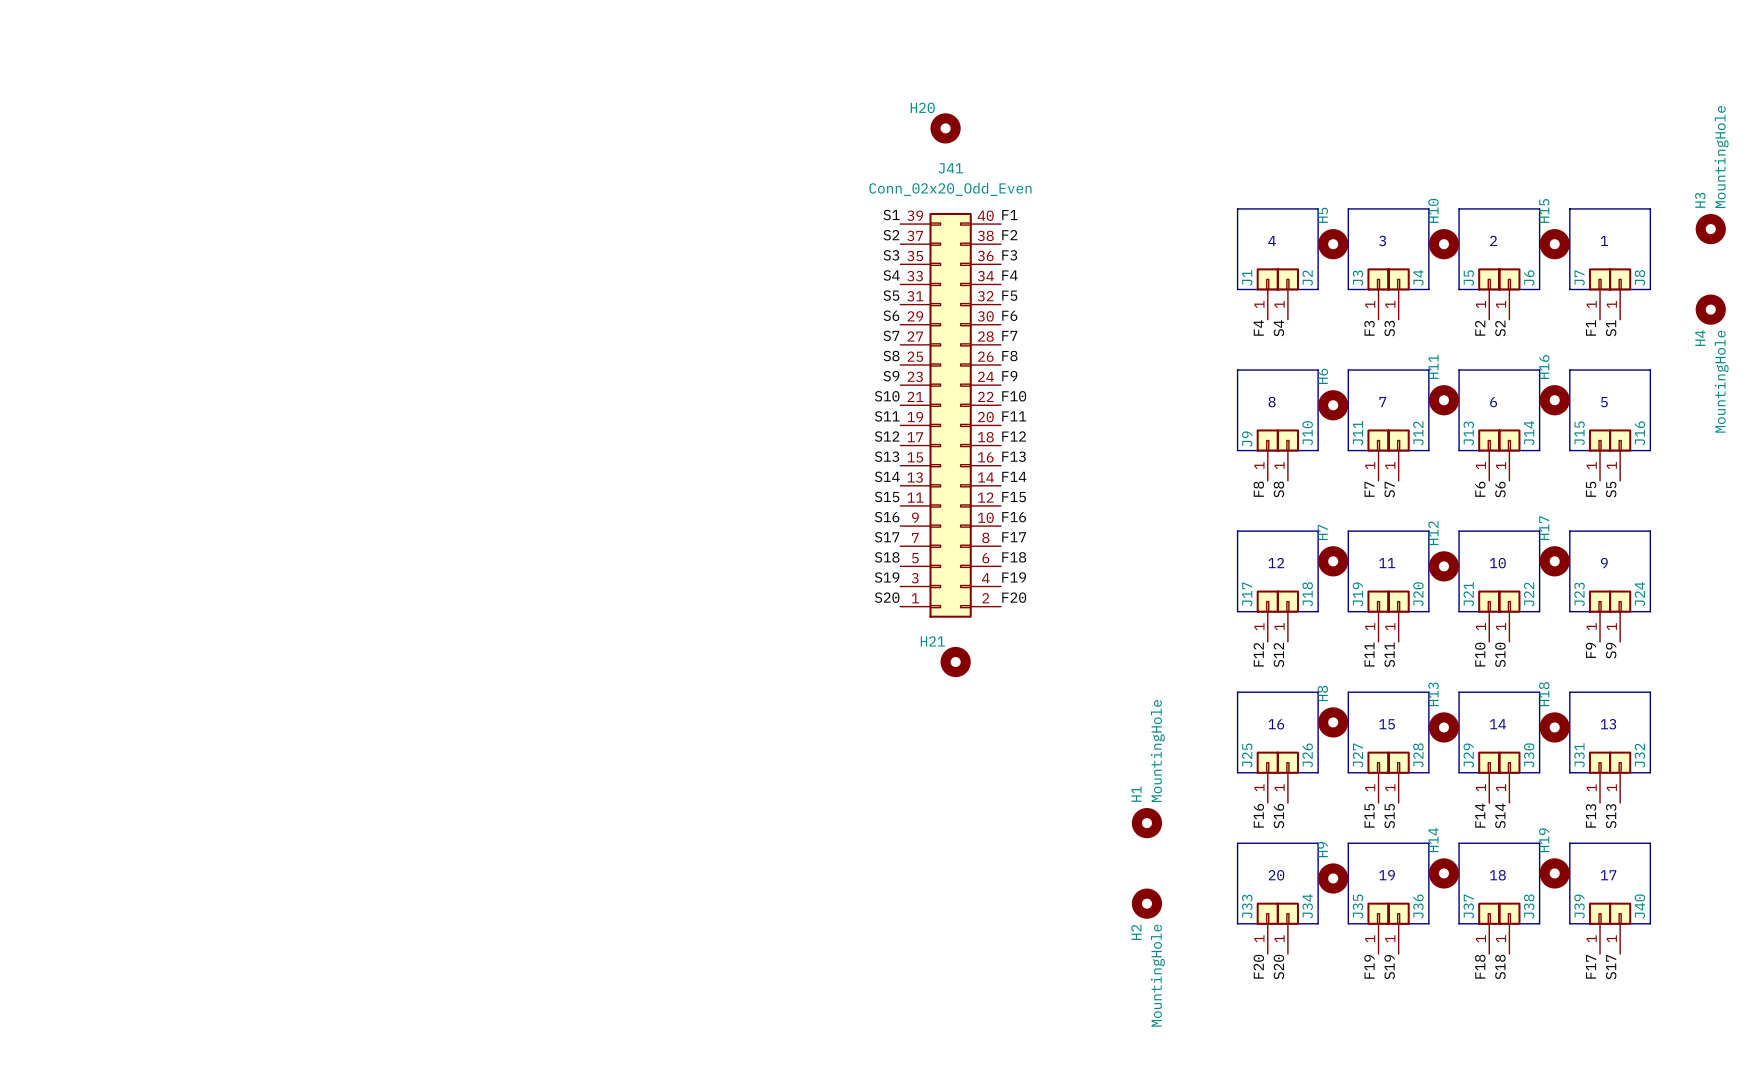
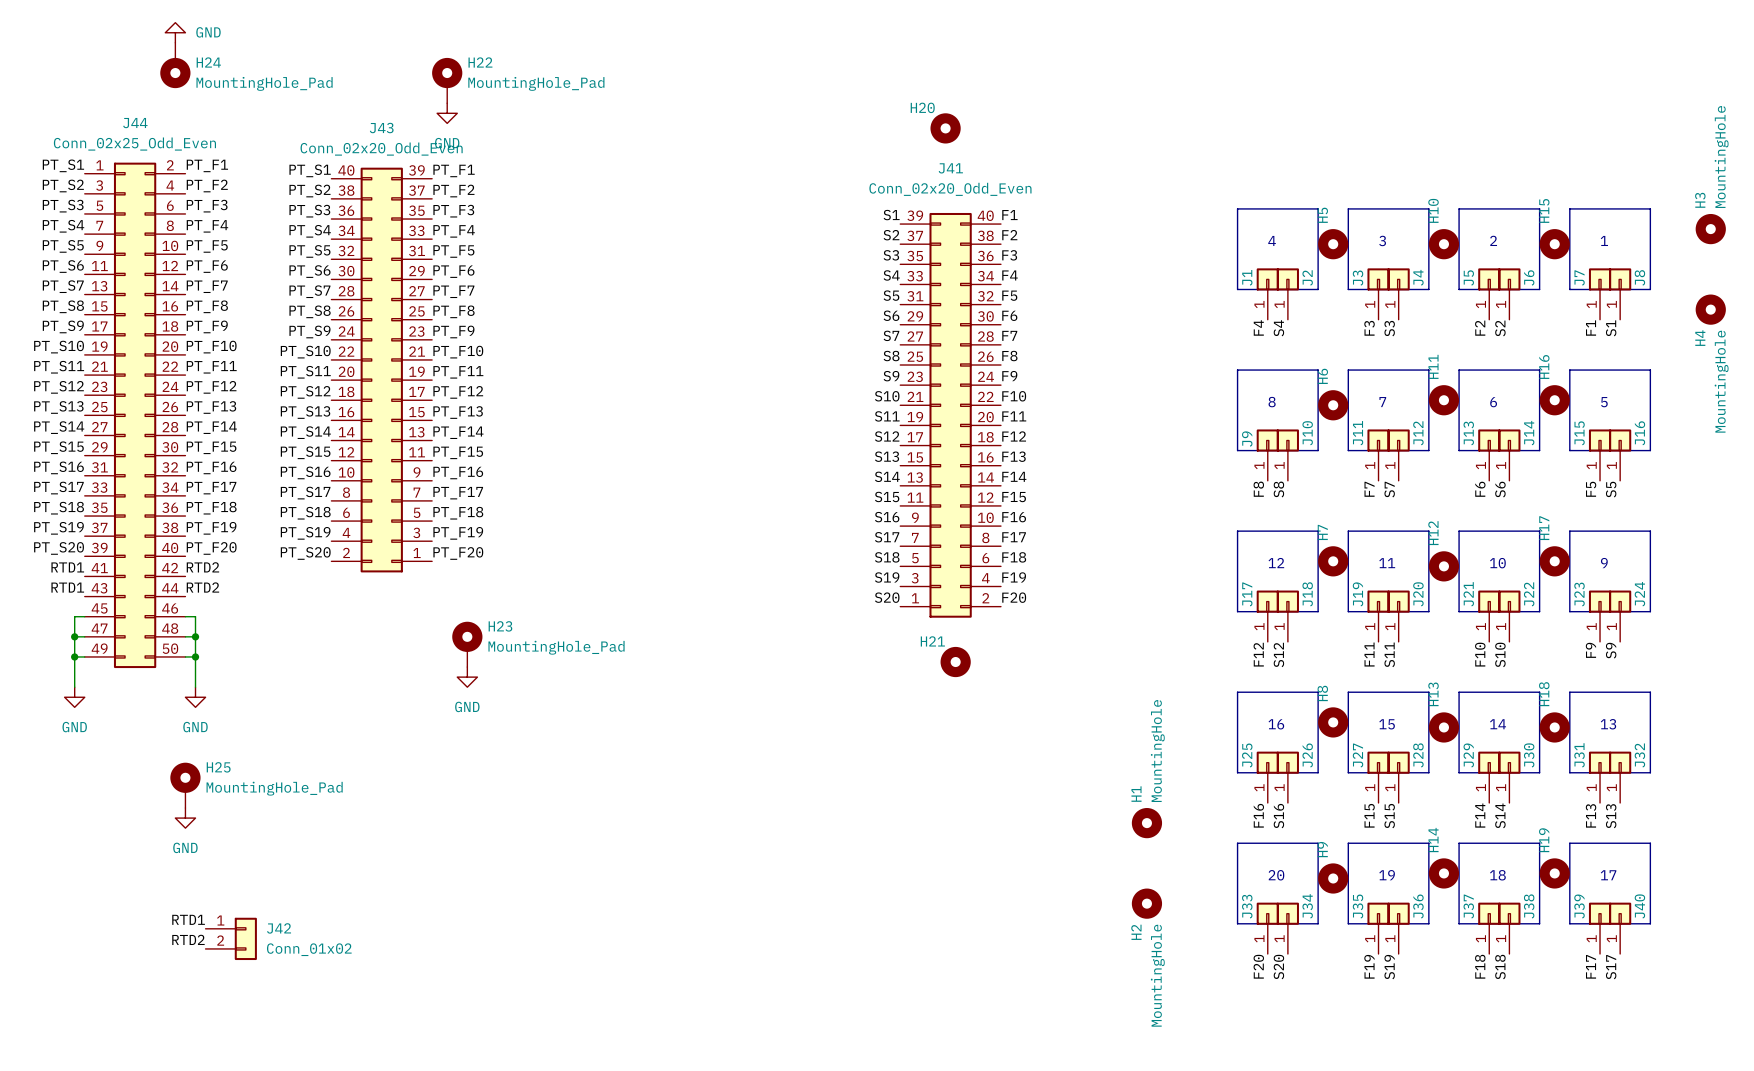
power symbol: none -> GND (175, 32)
H24: none -> MountingHole_Pad (175, 65)
H22: none -> MountingHole_Pad (447, 80)
power symbol: none -> GND (447, 113)
label: none -> PT_S1 (63, 165)
label: none -> PT_F1 (207, 165)
label: none -> PT_S1 (310, 170)
label: none -> PT_F1 (454, 170)
label: none -> PT_S2 (63, 185)
label: none -> PT_F2 (207, 185)
label: none -> PT_S2 (309, 191)
label: none -> PT_F2 (453, 191)
label: none -> PT_S3 (63, 206)
label: none -> PT_F3 (207, 206)
label: none -> PT_S3 (309, 211)
label: none -> PT_F3 (453, 211)
label: none -> PT_S4 (63, 226)
label: none -> PT_F4 (207, 226)
label: none -> PT_S4 (310, 231)
label: none -> PT_F4 (454, 231)
label: none -> PT_S5 (63, 246)
label: none -> PT_F5 (207, 246)
label: none -> PT_S5 (309, 251)
label: none -> PT_F5 (453, 251)
label: none -> PT_S6 (63, 266)
label: none -> PT_F6 (207, 266)
label: none -> PT_S6 (309, 271)
label: none -> PT_F6 (453, 271)
label: none -> PT_S7 (63, 286)
label: none -> PT_F7 (207, 286)
label: none -> PT_S7 (309, 291)
label: none -> PT_F7 (453, 291)
label: none -> PT_S8 (63, 306)
label: none -> PT_F8 (207, 306)
label: none -> PT_S8 (310, 311)
label: none -> PT_F8 (453, 311)
label: none -> PT_S9 (63, 326)
label: none -> PT_F9 (207, 326)
label: none -> PT_S9 (309, 331)
label: none -> PT_F9 (453, 331)
label: none -> PT_S10 (59, 347)
label: none -> PT_F10 (211, 347)
label: none -> PT_S10 (305, 352)
label: none -> PT_F10 (458, 352)
label: none -> PT_S11 (59, 367)
label: none -> PT_F11 (211, 367)
J43: none -> Conn_02x20_Odd_Even (381, 370)
label: none -> PT_S11 (305, 372)
label: none -> PT_F11 (458, 372)
label: none -> PT_S12 (58, 387)
label: none -> PT_F12 (211, 387)
label: none -> PT_S12 (305, 392)
label: none -> PT_F12 (458, 392)
label: none -> PT_S13 (58, 407)
label: none -> PT_F13 (211, 407)
label: none -> PT_S13 (305, 412)
label: none -> PT_F13 (458, 412)
J44: none -> Conn_02x25_Odd_Even (135, 415)
label: none -> PT_S14 (59, 427)
label: none -> PT_F14 (211, 427)
label: none -> PT_S14 (305, 432)
label: none -> PT_F14 (458, 432)
label: none -> PT_S15 (58, 447)
label: none -> PT_F15 (211, 447)
label: none -> PT_S15 (305, 452)
label: none -> PT_F15 (458, 452)
label: none -> PT_S16 (58, 467)
label: none -> PT_F16 (211, 467)
label: none -> PT_S16 (305, 472)
label: none -> PT_F16 (458, 473)
label: none -> PT_S17 (58, 488)
label: none -> PT_F17 (211, 488)
label: none -> PT_S17 (305, 493)
label: none -> PT_F17 (458, 493)
label: none -> PT_S18 (59, 508)
label: none -> PT_F18 (211, 508)
label: none -> PT_S18 (305, 513)
label: none -> PT_F18 (458, 513)
label: none -> PT_S19 (58, 528)
label: none -> PT_F19 (211, 528)
label: none -> PT_S19 (305, 533)
label: none -> PT_F19 (458, 533)
label: none -> PT_S20 (59, 548)
label: none -> PT_F20 (211, 548)
label: none -> PT_S20 (305, 553)
label: none -> PT_F20 (458, 553)
label: none -> RTD1 (67, 567)
label: none -> RTD2 (202, 567)
label: none -> RTD1 (67, 587)
label: none -> RTD2 (202, 587)
wire: none -> (84, 616) (74, 616) (74, 687)
wire: none -> (185, 616) (195, 616) (195, 687)
wire: none -> (74, 636) (84, 636)
junction: none -> (74, 636)
wire: none -> (185, 636) (195, 636)
junction: none -> (195, 636)
H23: none -> MountingHole_Pad (467, 644)
wire: none -> (74, 656) (84, 656)
junction: none -> (74, 656)
wire: none -> (185, 656) (195, 656)
junction: none -> (195, 656)
power symbol: none -> GND (467, 677)
power symbol: none -> GND (74, 697)
power symbol: none -> GND (195, 697)
H25: none -> MountingHole_Pad (185, 785)
power symbol: none -> GND (185, 818)
label: none -> RTD1 (188, 919)
J42: none -> Conn_01x02 (231, 938)
label: none -> RTD2 (188, 939)

